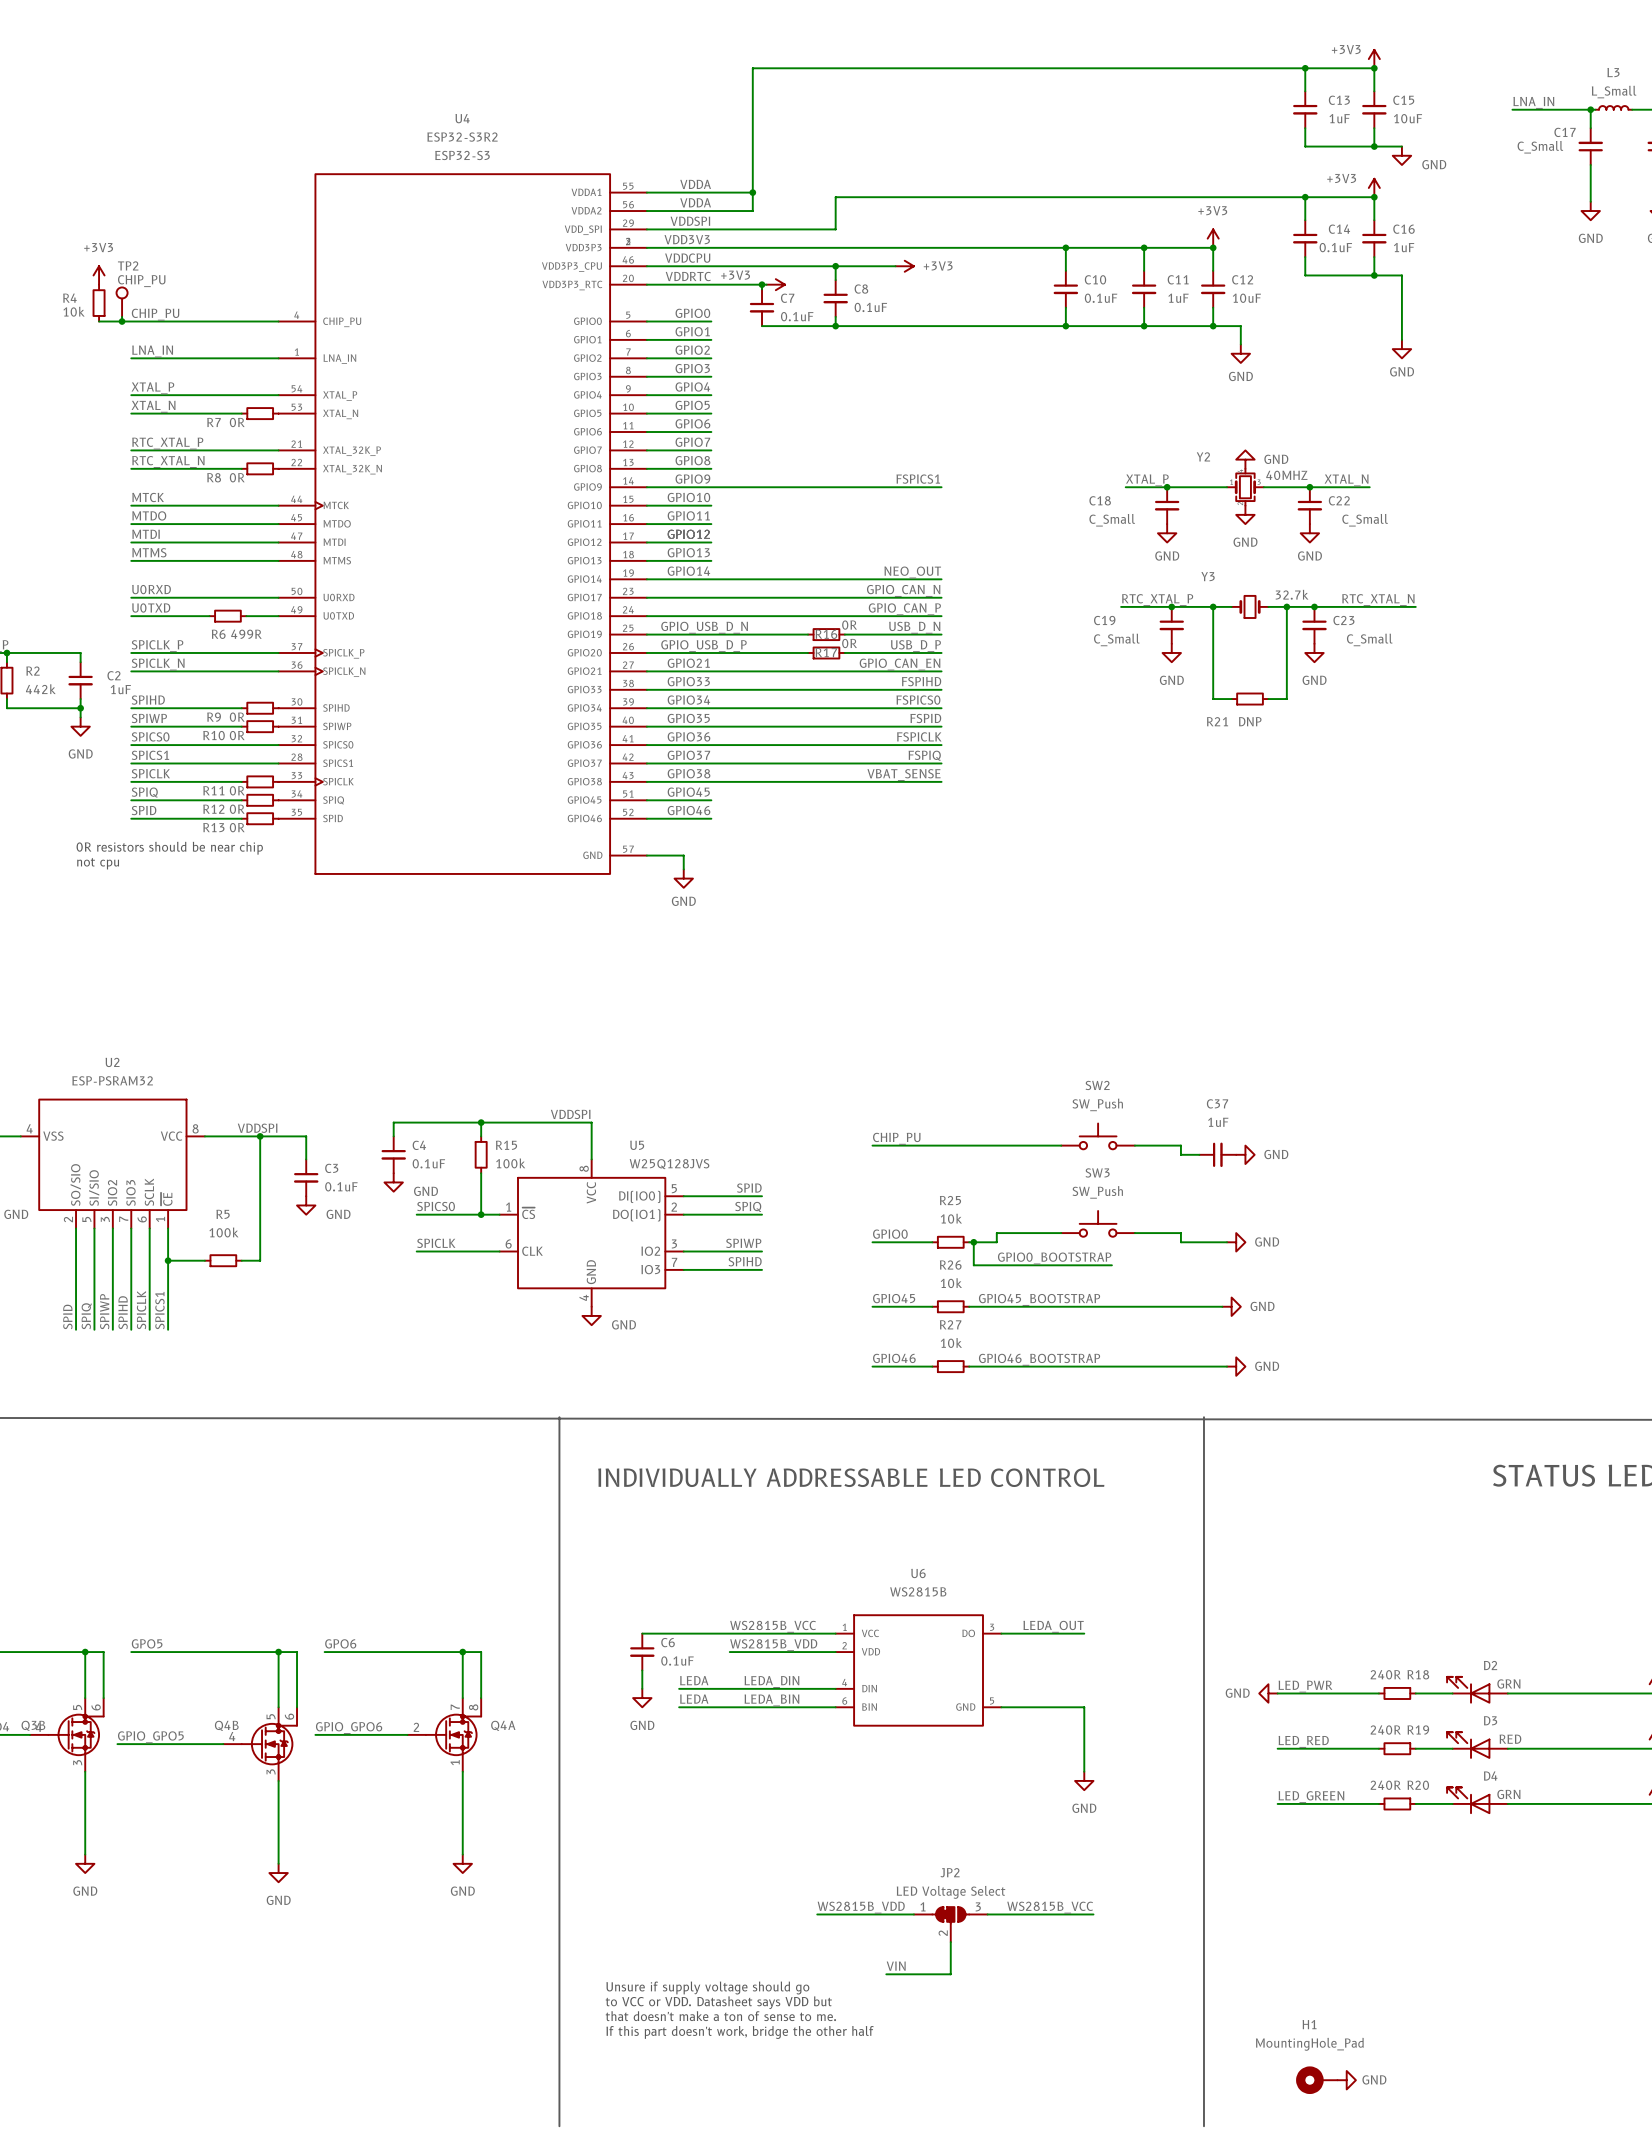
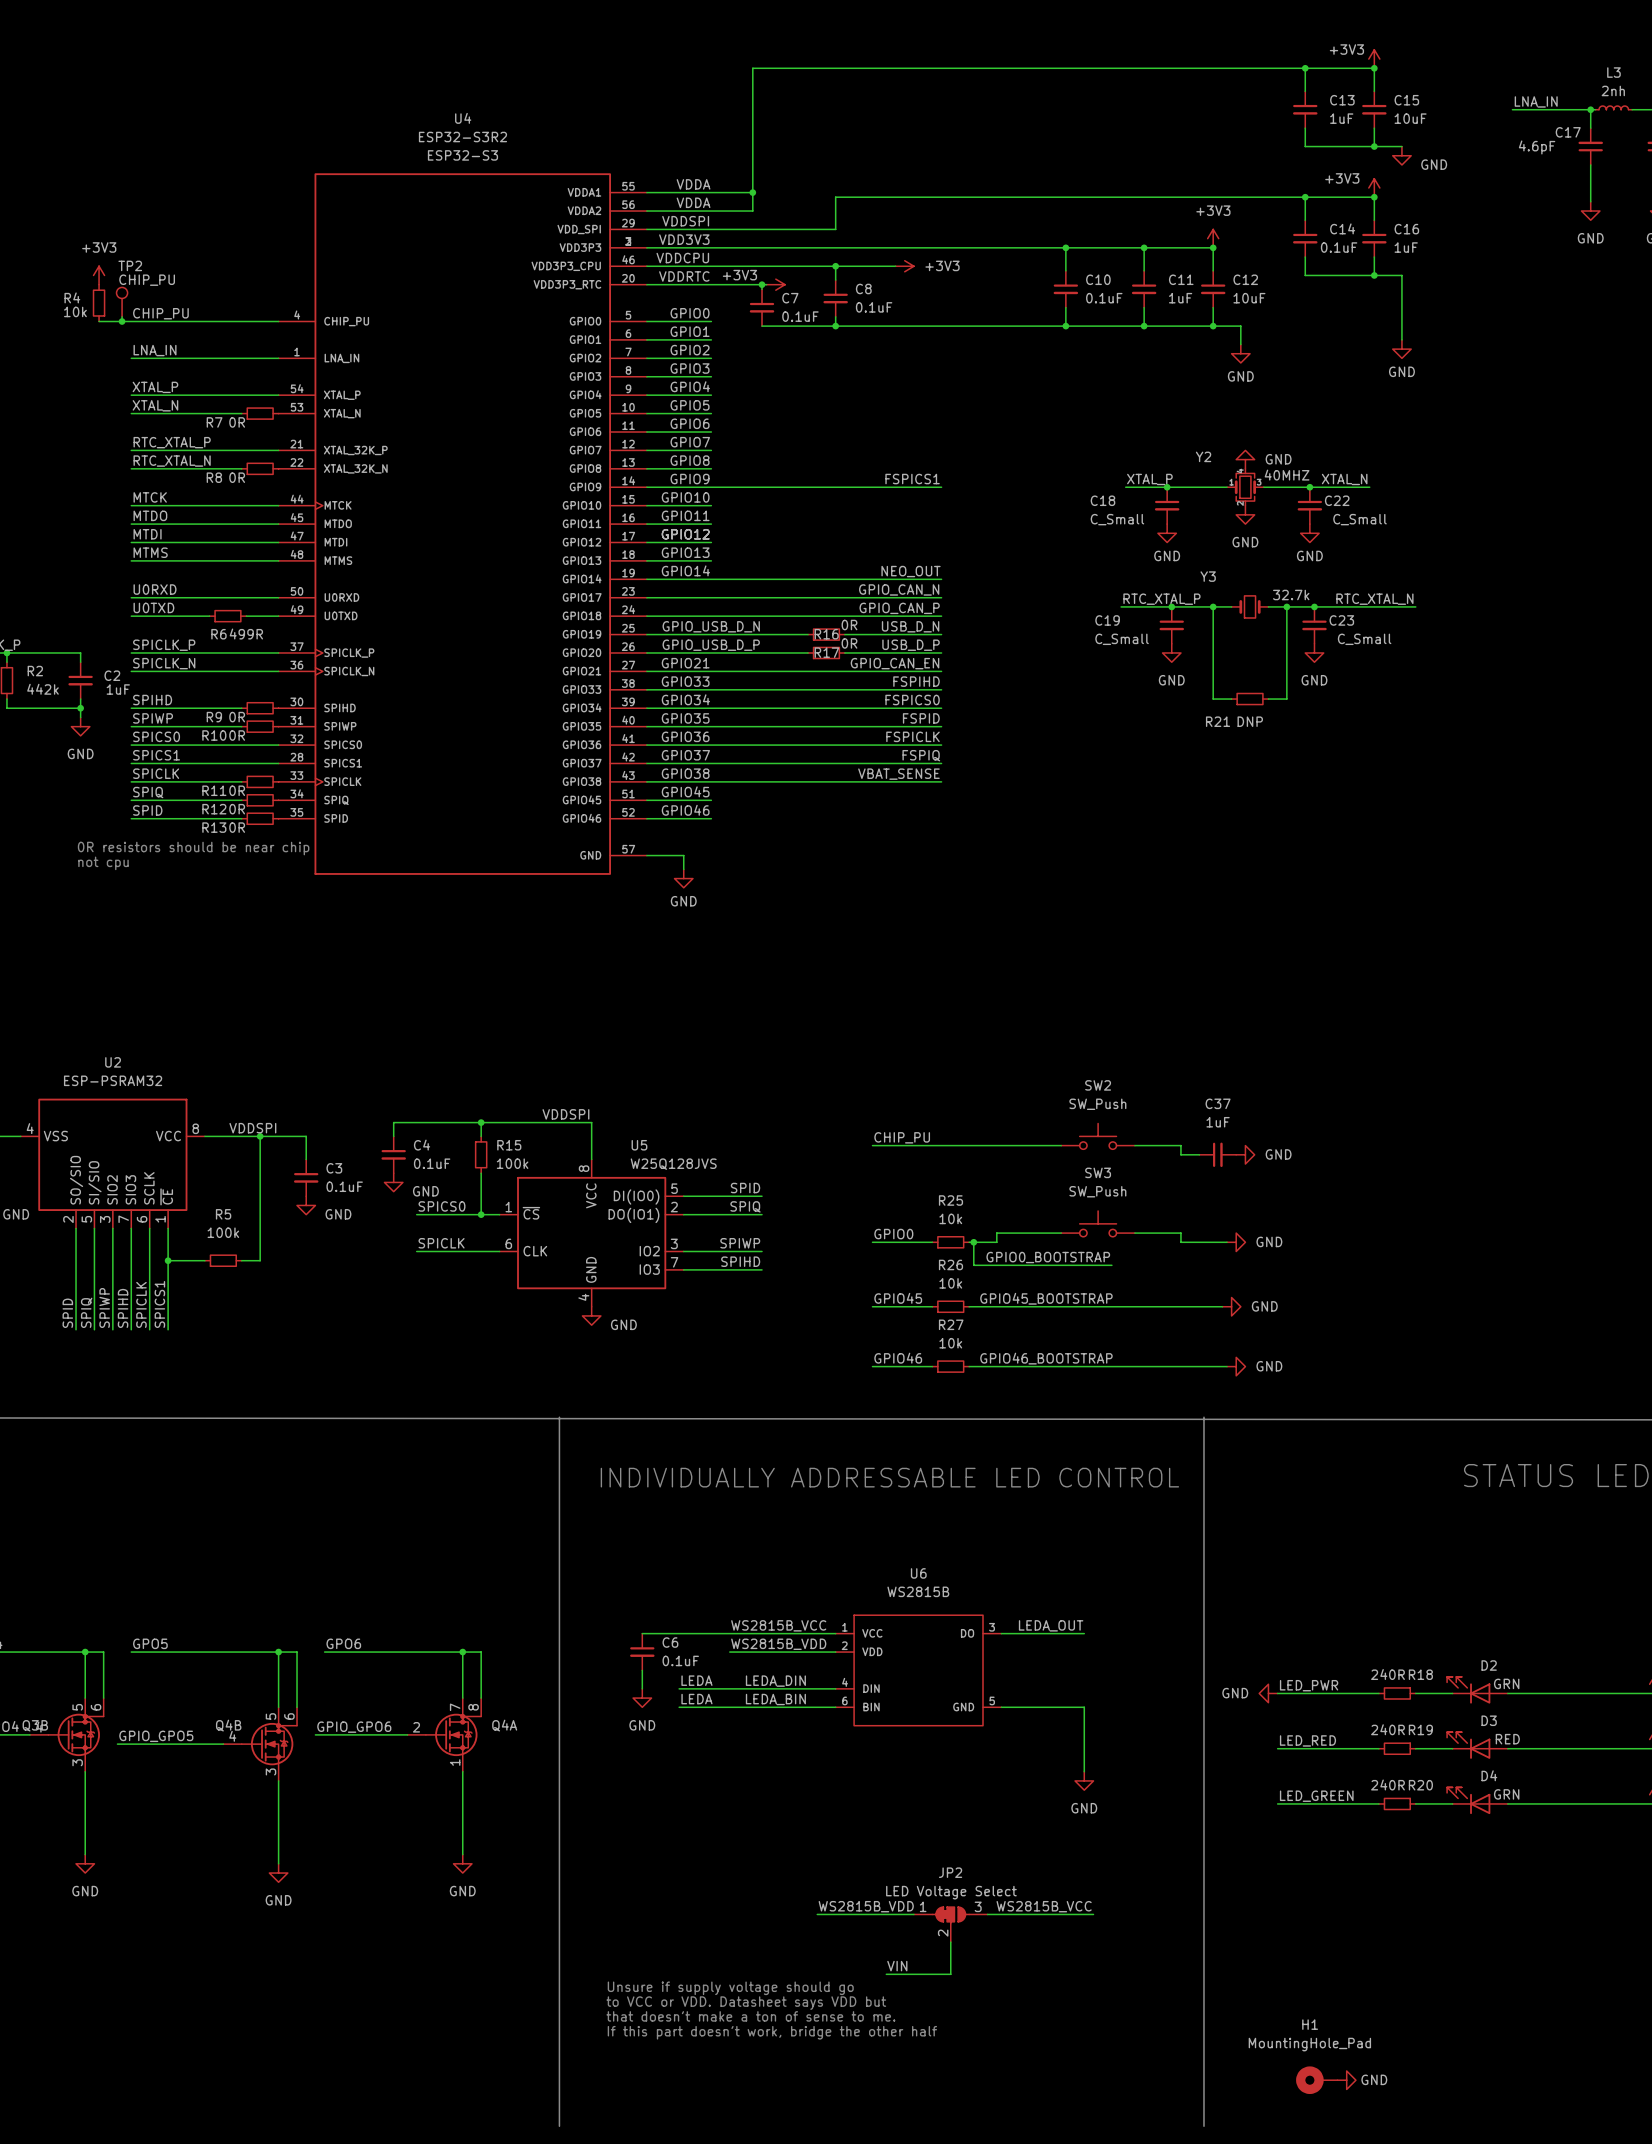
L3 value: L_Small (1614, 92) -> 2nh (1613, 90)
C17 value: C_Small (1540, 147) -> 4.6pF (1537, 147)

